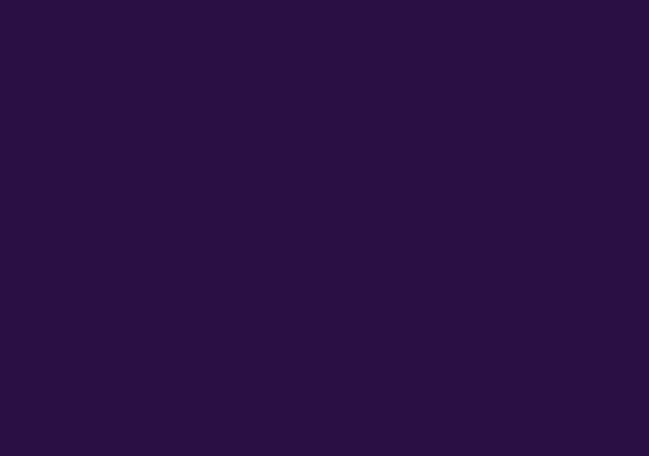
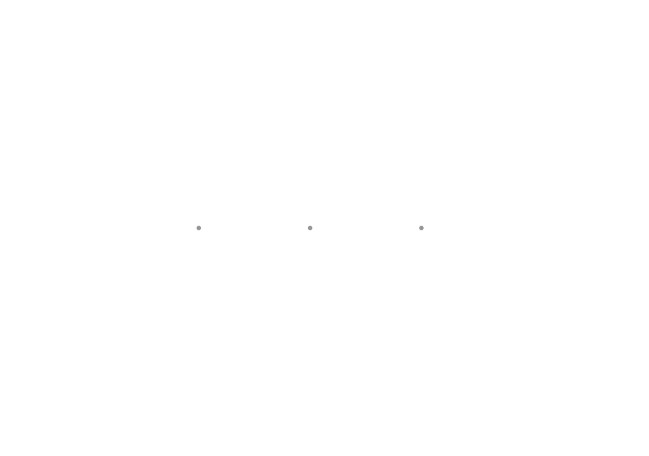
part: none -> (198, 228)
part: none -> (310, 228)
part: none -> (421, 228)

